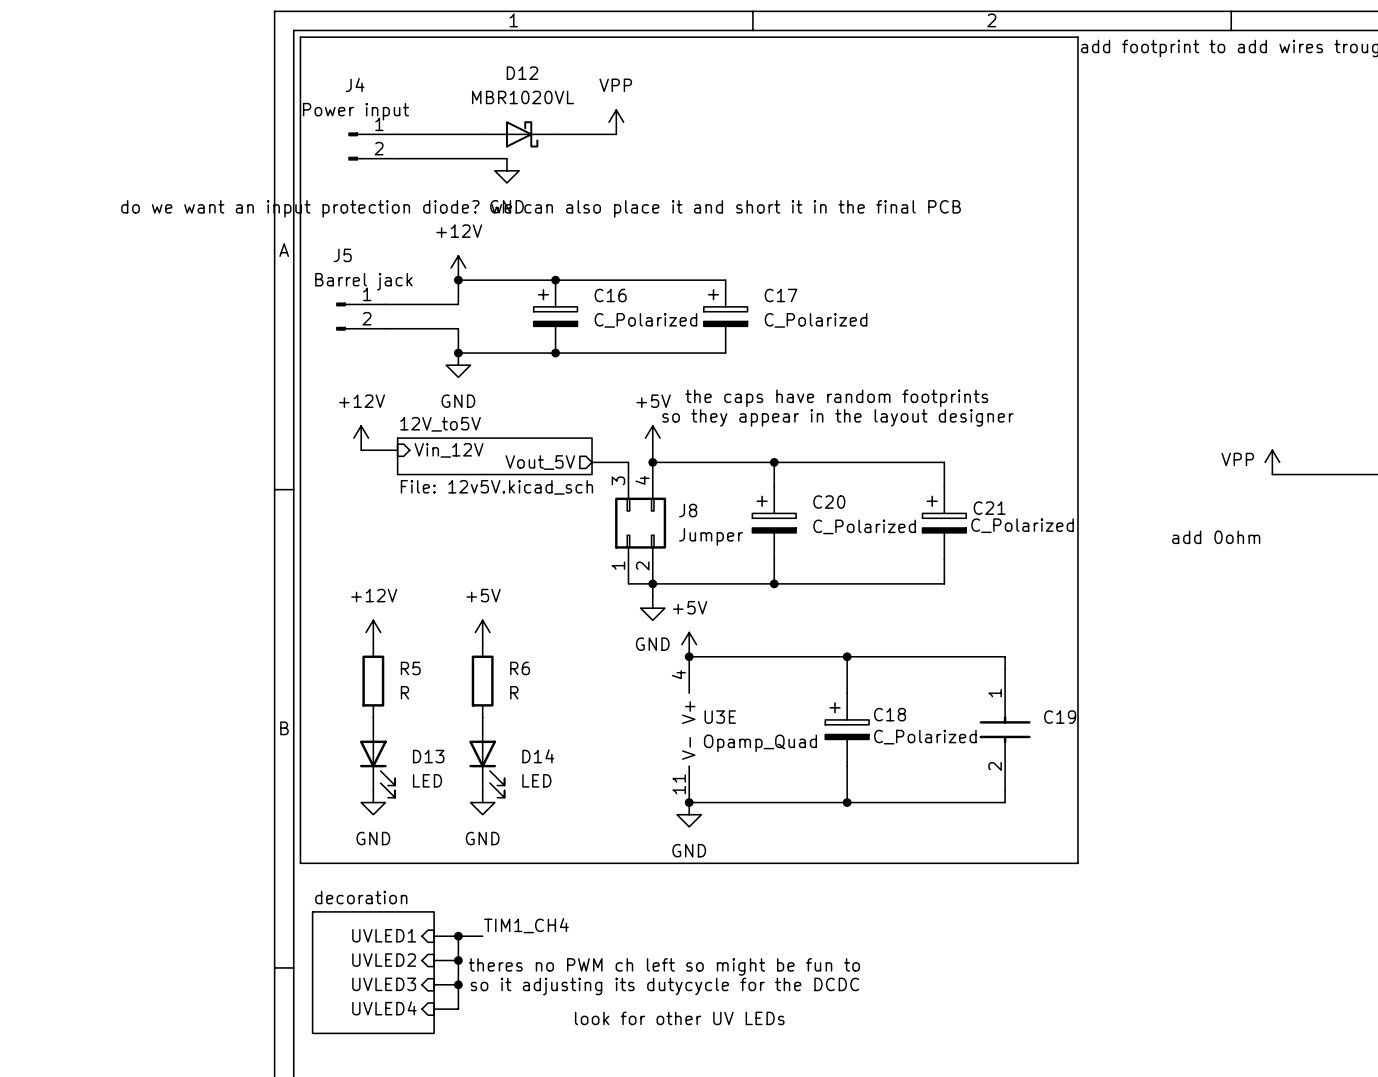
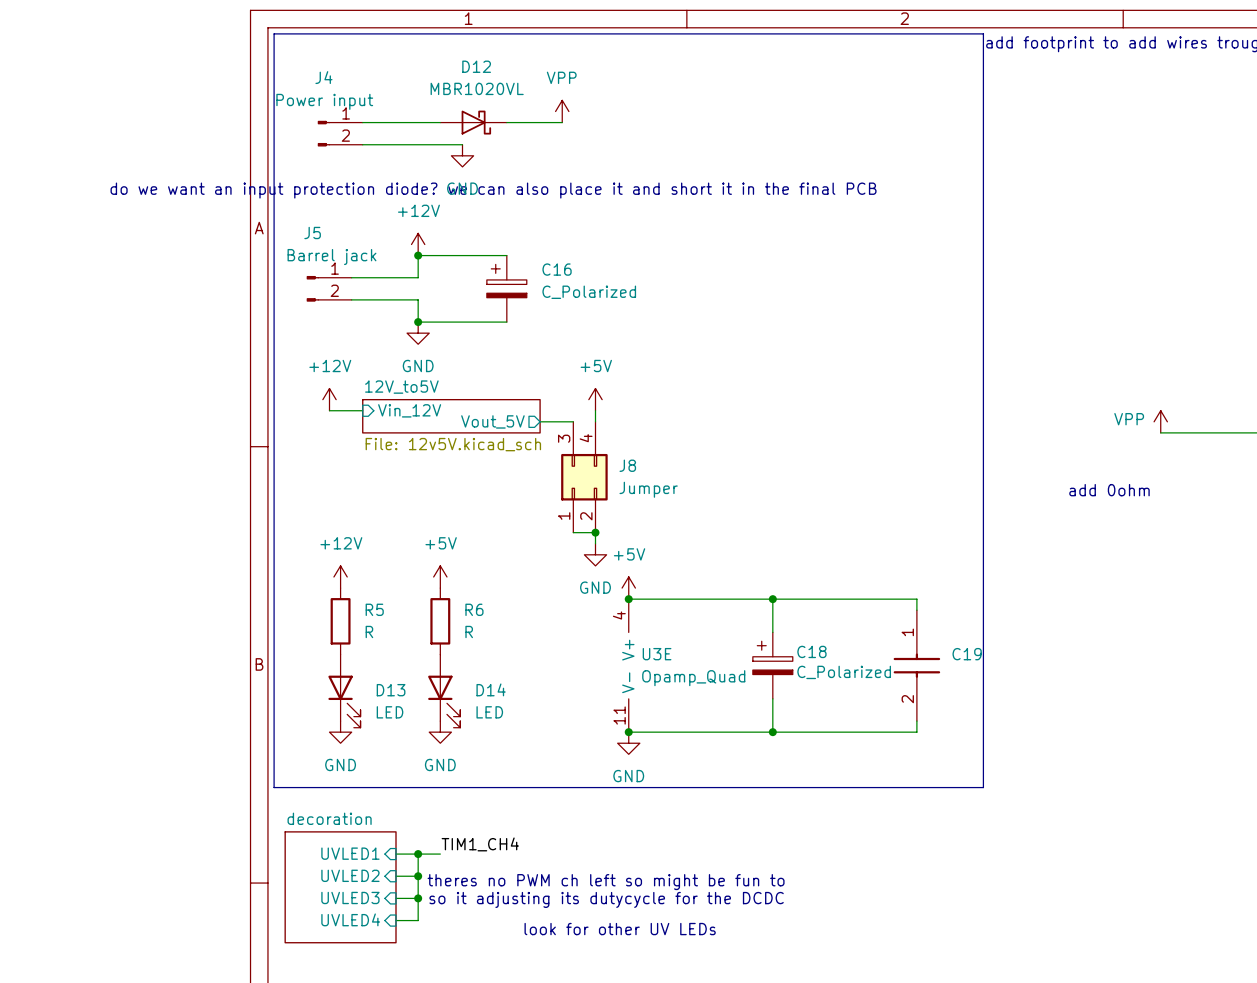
wire: (555, 280) (725, 280) -> none
junction: (555, 280) -> none
C17: C_Polarized (725, 316) -> none
wire: (555, 353) (725, 353) -> none
junction: (555, 353) -> none
text: the caps have random footprints (836, 398) -> none
text: so they appear in the layout designer (838, 417) -> none
wire: (652, 462) (944, 462) (944, 486) -> none
junction: (652, 462) -> none
wire: (774, 462) (774, 486) -> none
junction: (774, 462) -> none
C20: C_Polarized (774, 523) -> none
C21: C_Polarized (944, 523) -> none
wire: (774, 559) (774, 583) -> none
wire: (944, 559) (944, 583) (652, 583) -> none
junction: (774, 583) -> none

